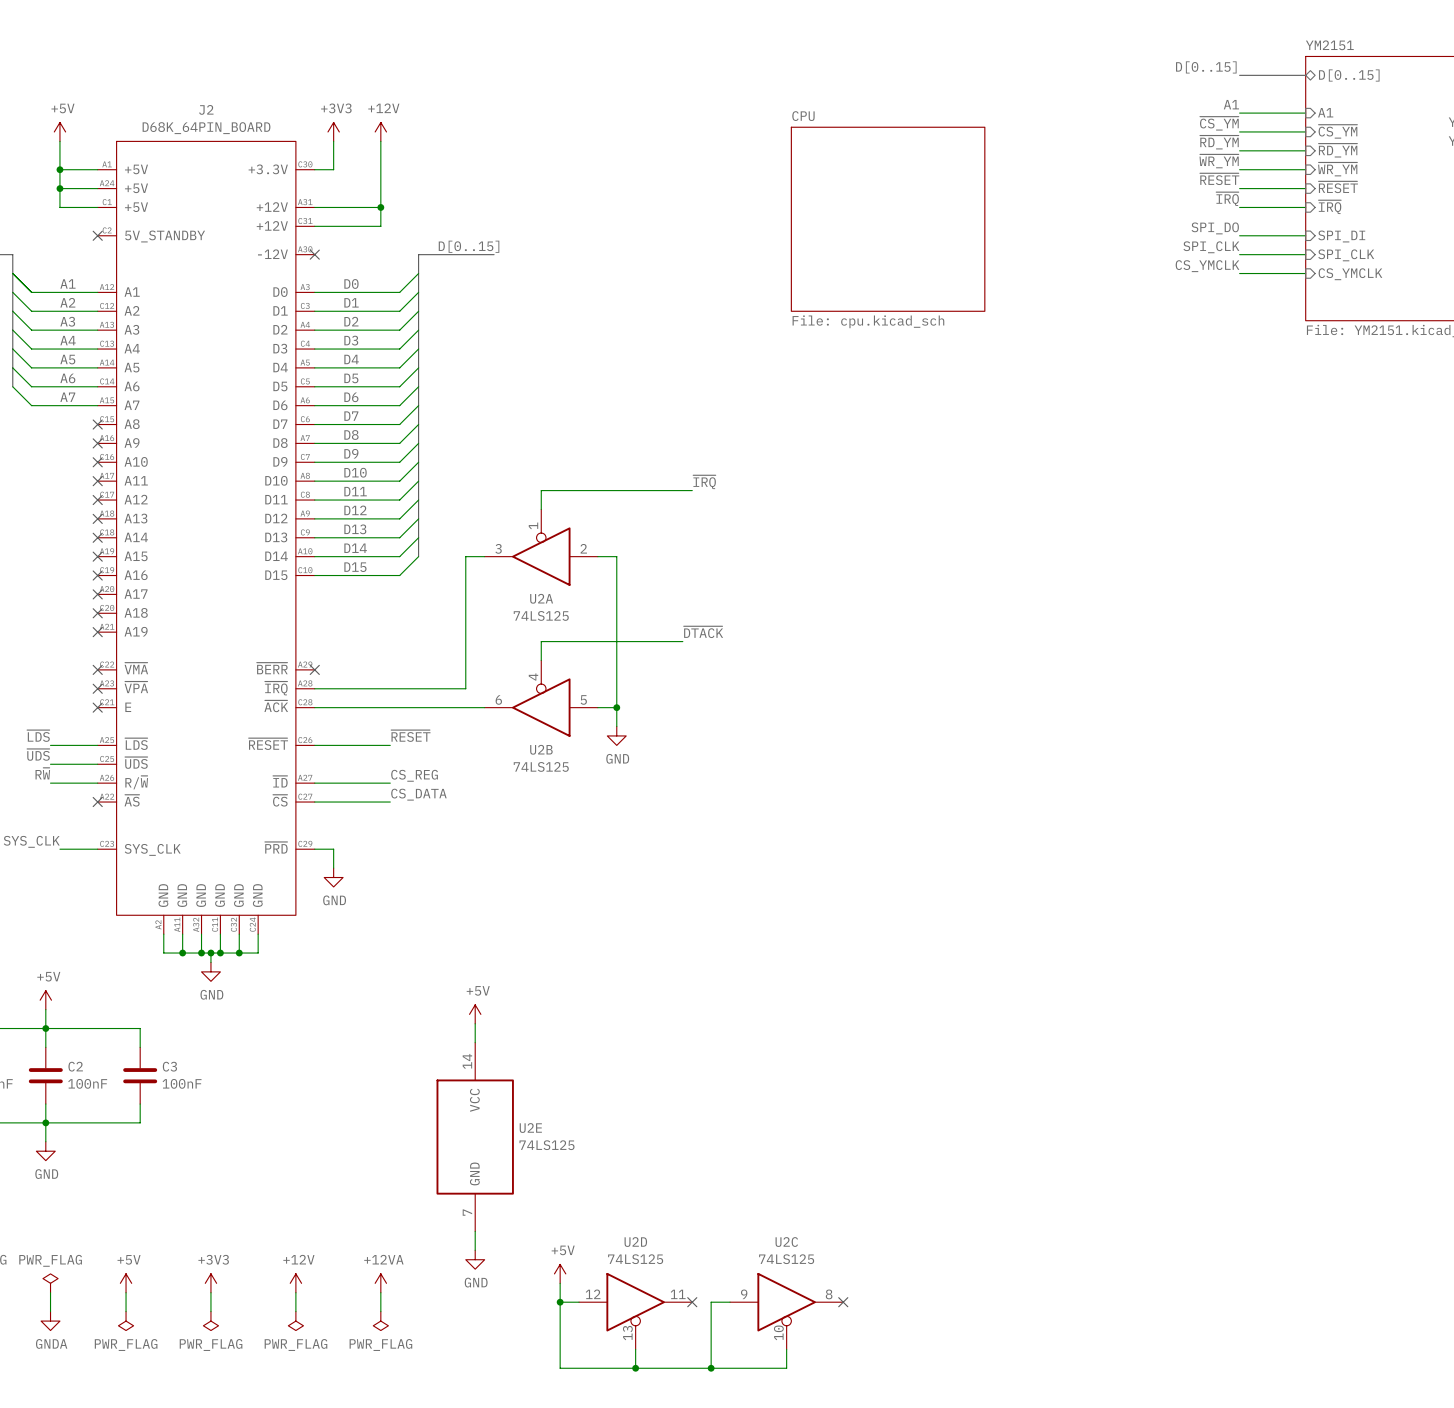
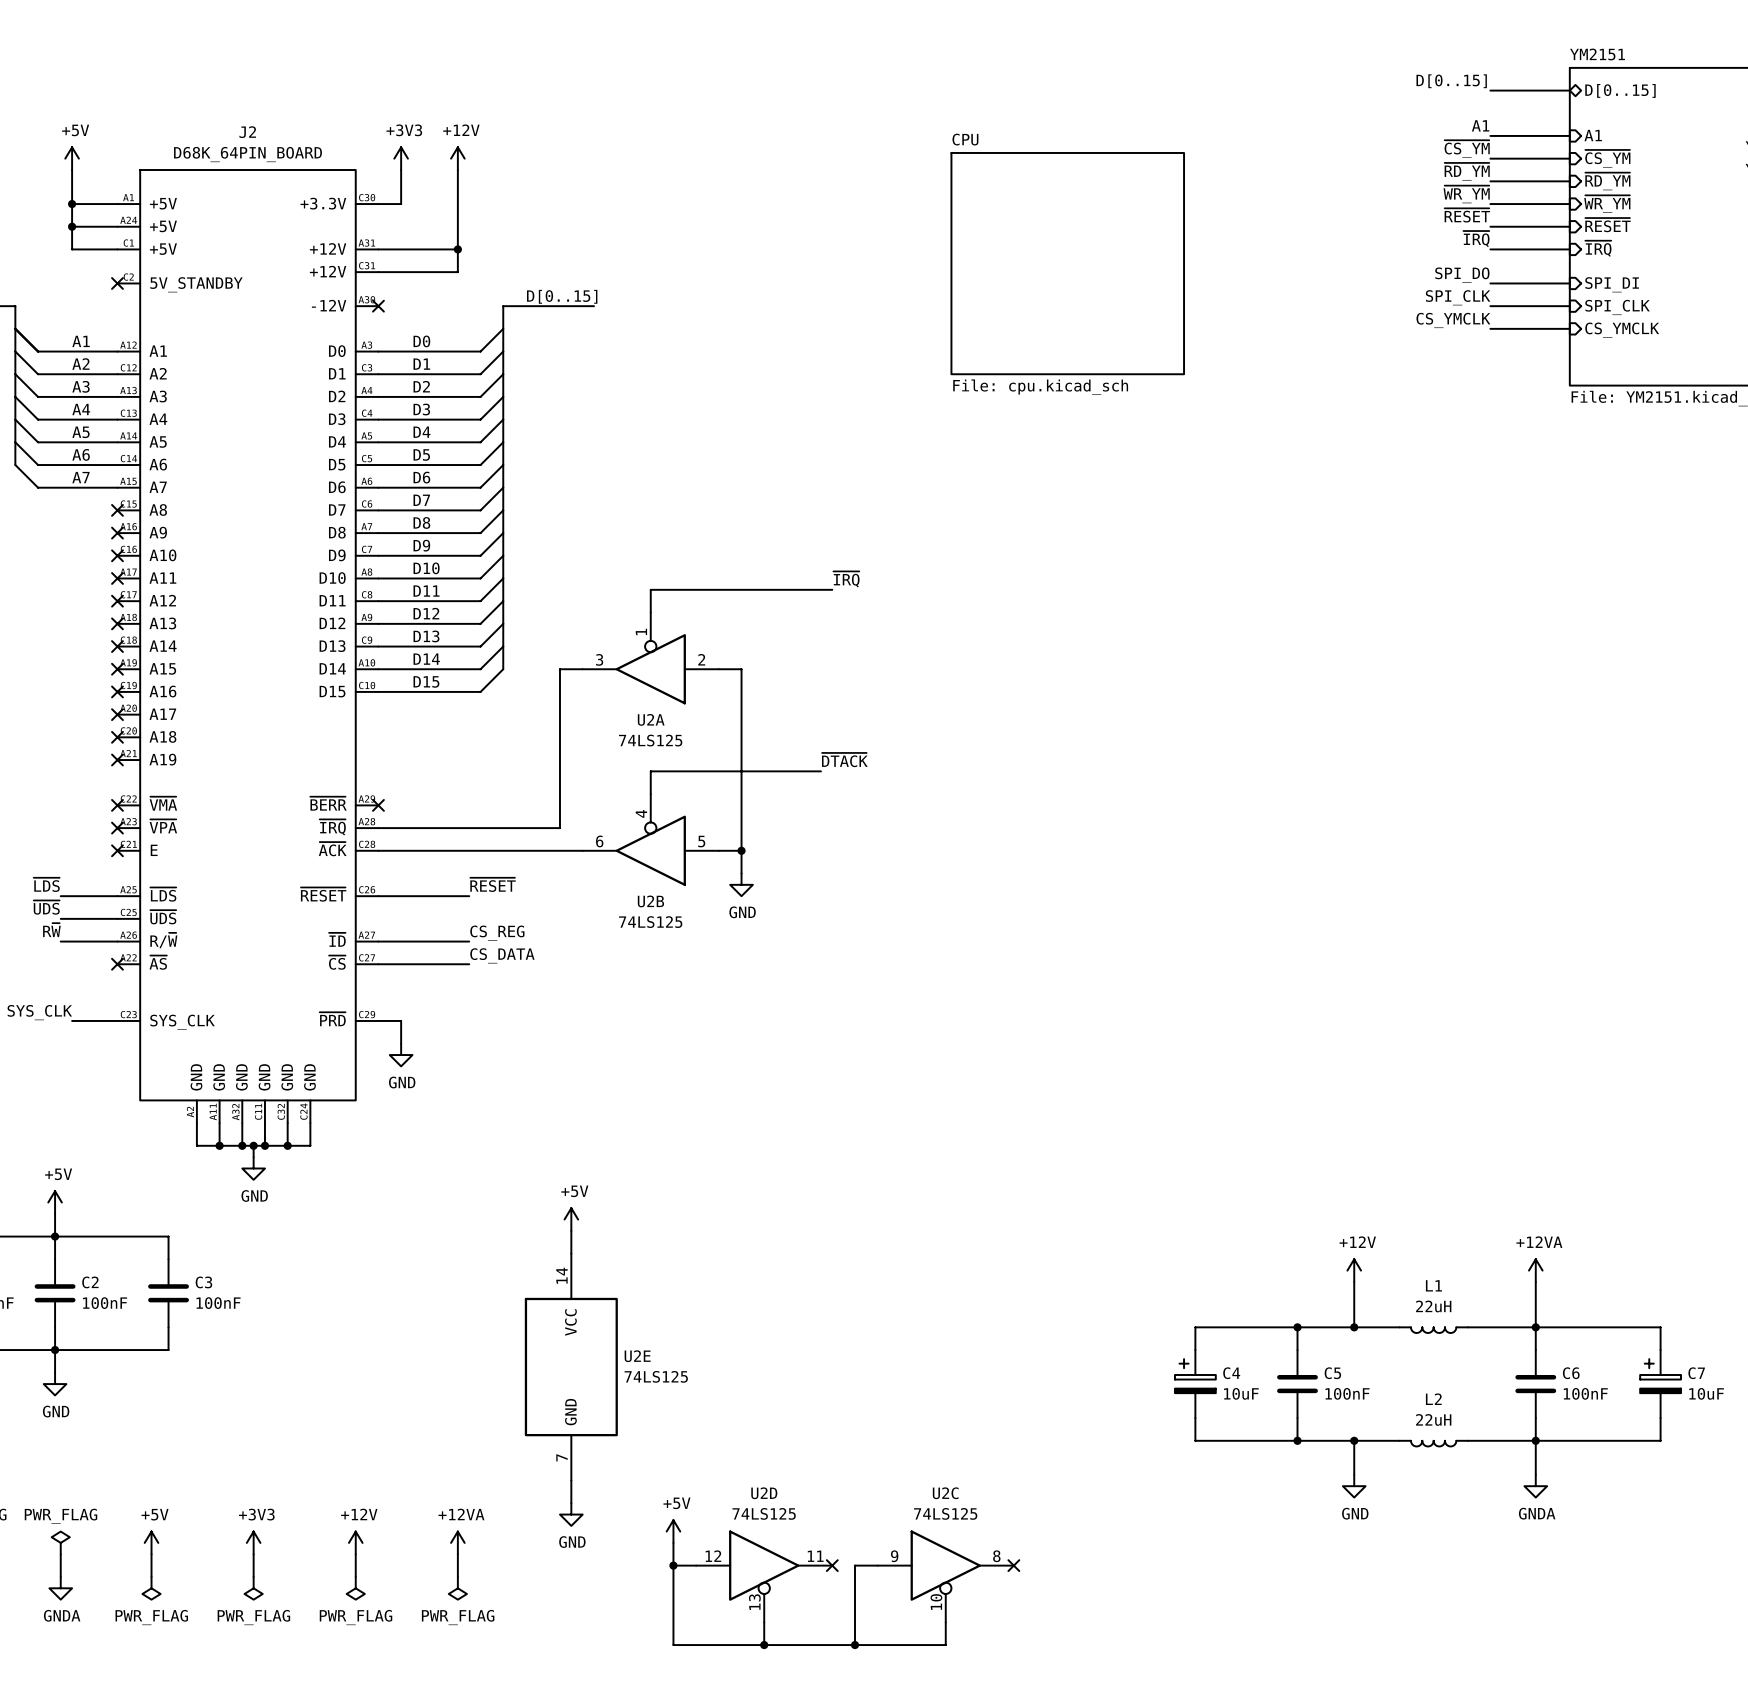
power symbol: none -> +12V (1354, 1270)
power symbol: none -> +12VA (1535, 1270)
wire: none -> (1354, 1281) (1354, 1327)
wire: none -> (1535, 1281) (1535, 1350)
wire: none -> (1297, 1327) (1297, 1350)
junction: none -> (1297, 1327)
junction: none -> (1354, 1327)
wire: none -> (1399, 1327) (1195, 1327) (1195, 1350)
wire: none -> (1467, 1327) (1660, 1327) (1660, 1350)
junction: none -> (1535, 1327)
L1: none -> 22uH (1433, 1330)
C4: none -> 10uF (1195, 1384)
C5: none -> 100nF (1297, 1384)
C6: none -> 100nF (1535, 1384)
C7: none -> 10uF (1660, 1384)
wire: none -> (1195, 1418) (1195, 1440) (1399, 1440)
wire: none -> (1297, 1418) (1297, 1440)
wire: none -> (1535, 1418) (1535, 1474)
wire: none -> (1660, 1418) (1660, 1440) (1467, 1440)
junction: none -> (1297, 1440)
wire: none -> (1354, 1440) (1354, 1474)
junction: none -> (1354, 1440)
junction: none -> (1535, 1440)
L2: none -> 22uH (1433, 1443)
power symbol: none -> GND (1354, 1486)
power symbol: none -> GNDA (1535, 1486)

